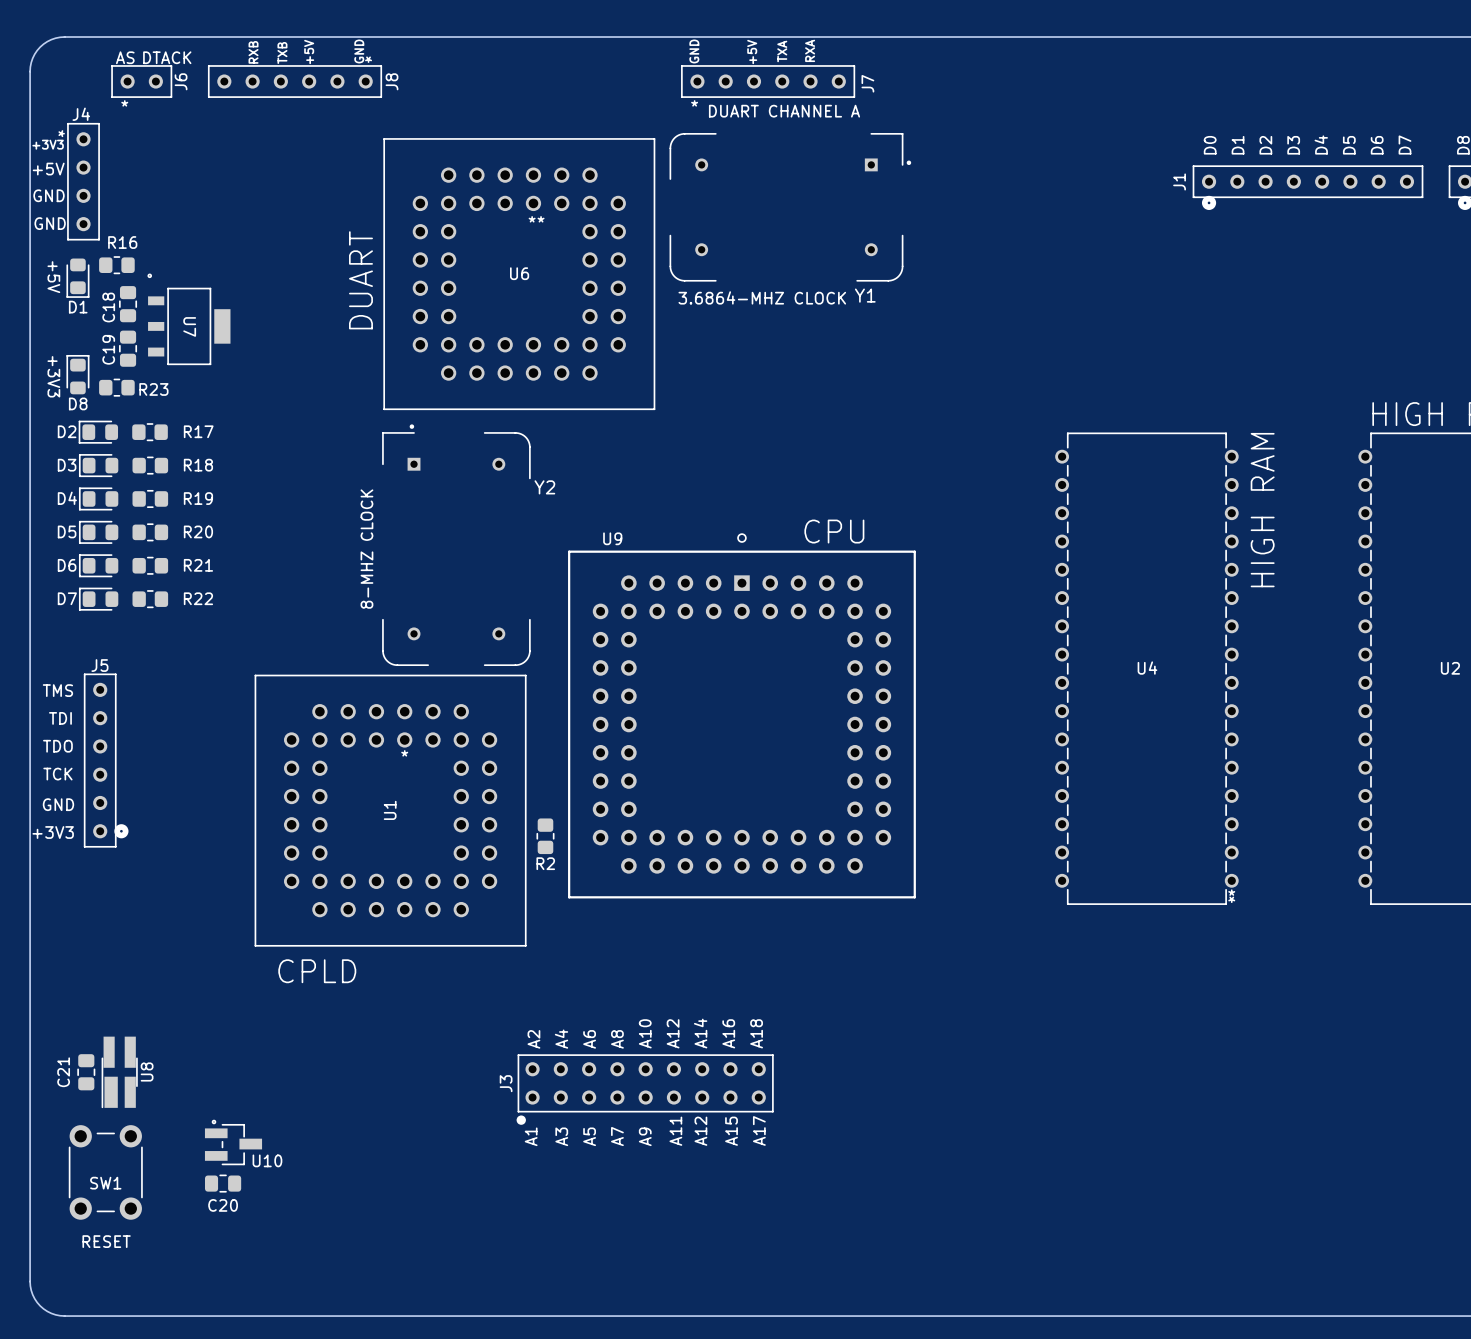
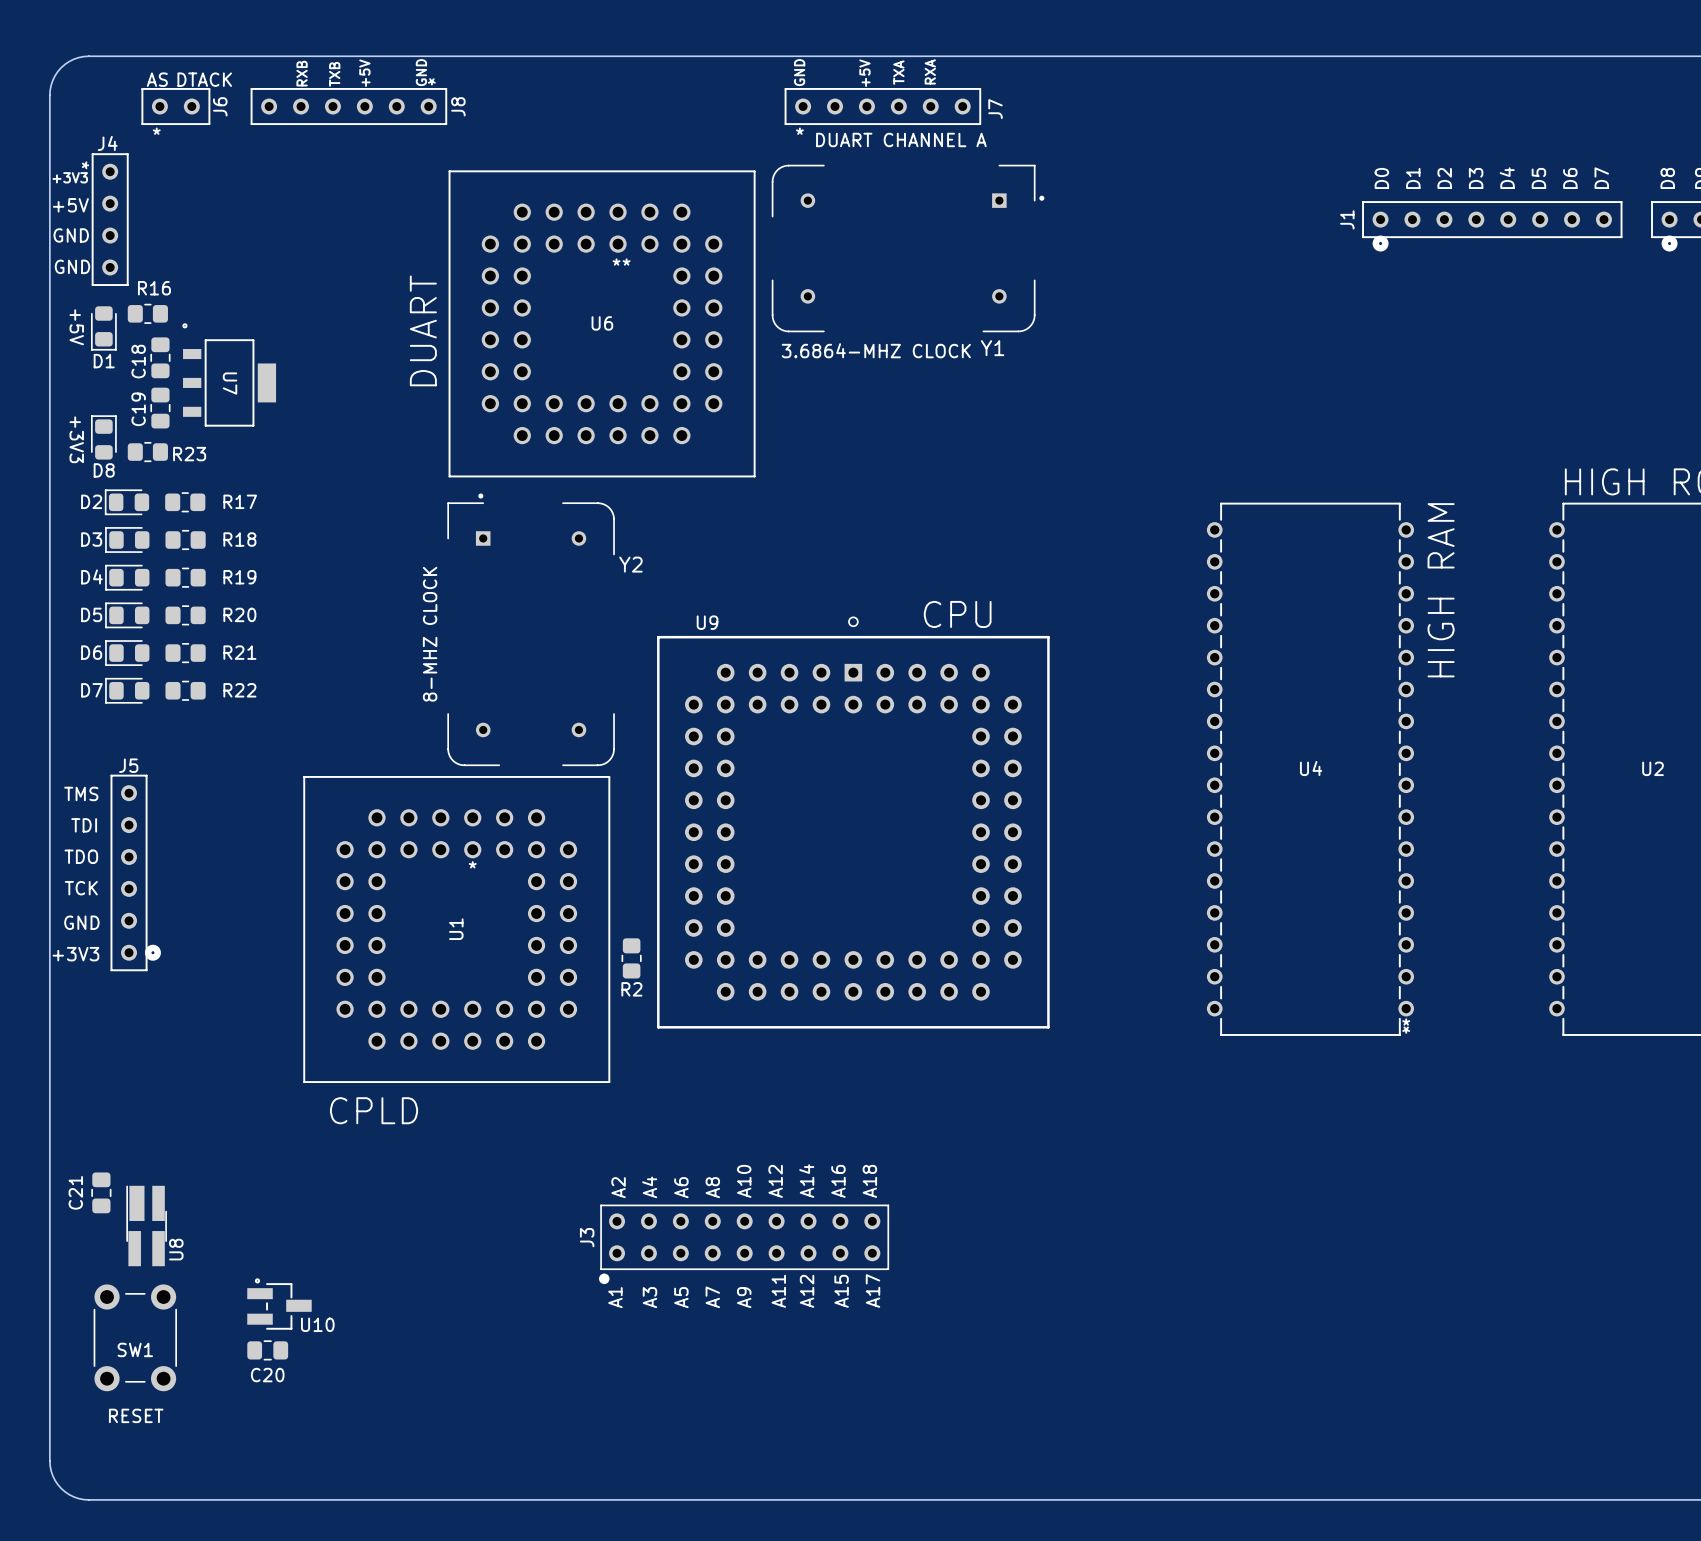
U8 footprint: [101, 1036, 138, 1108] -> [126, 1185, 167, 1267]
C21 position: (86, 1072) -> (101, 1192)

